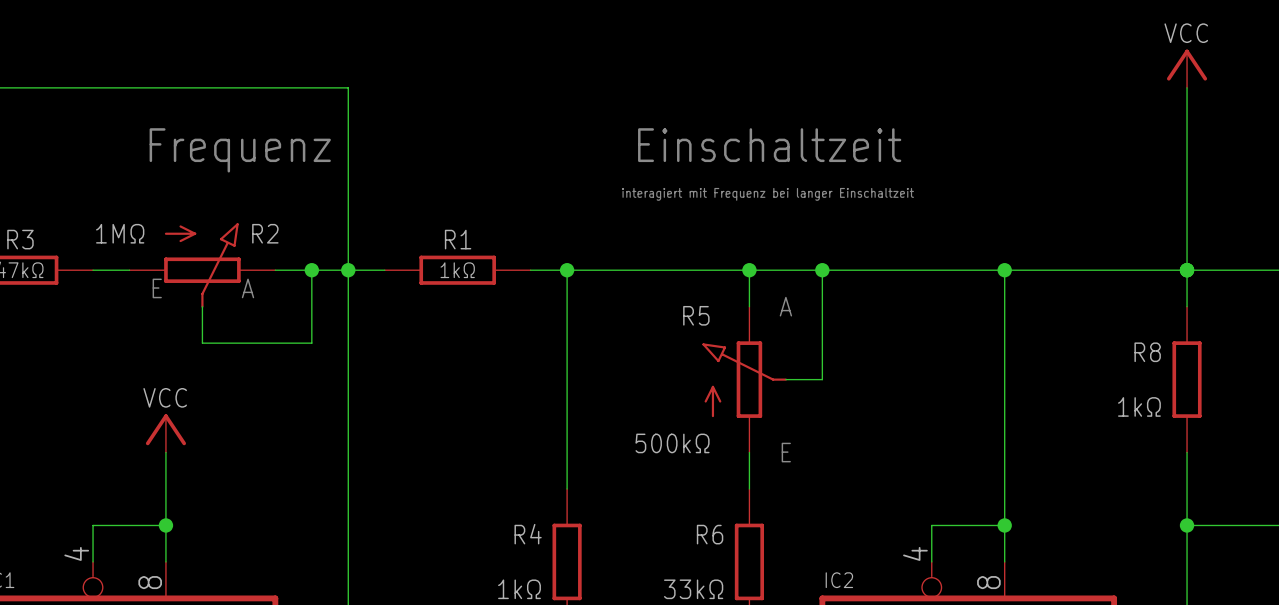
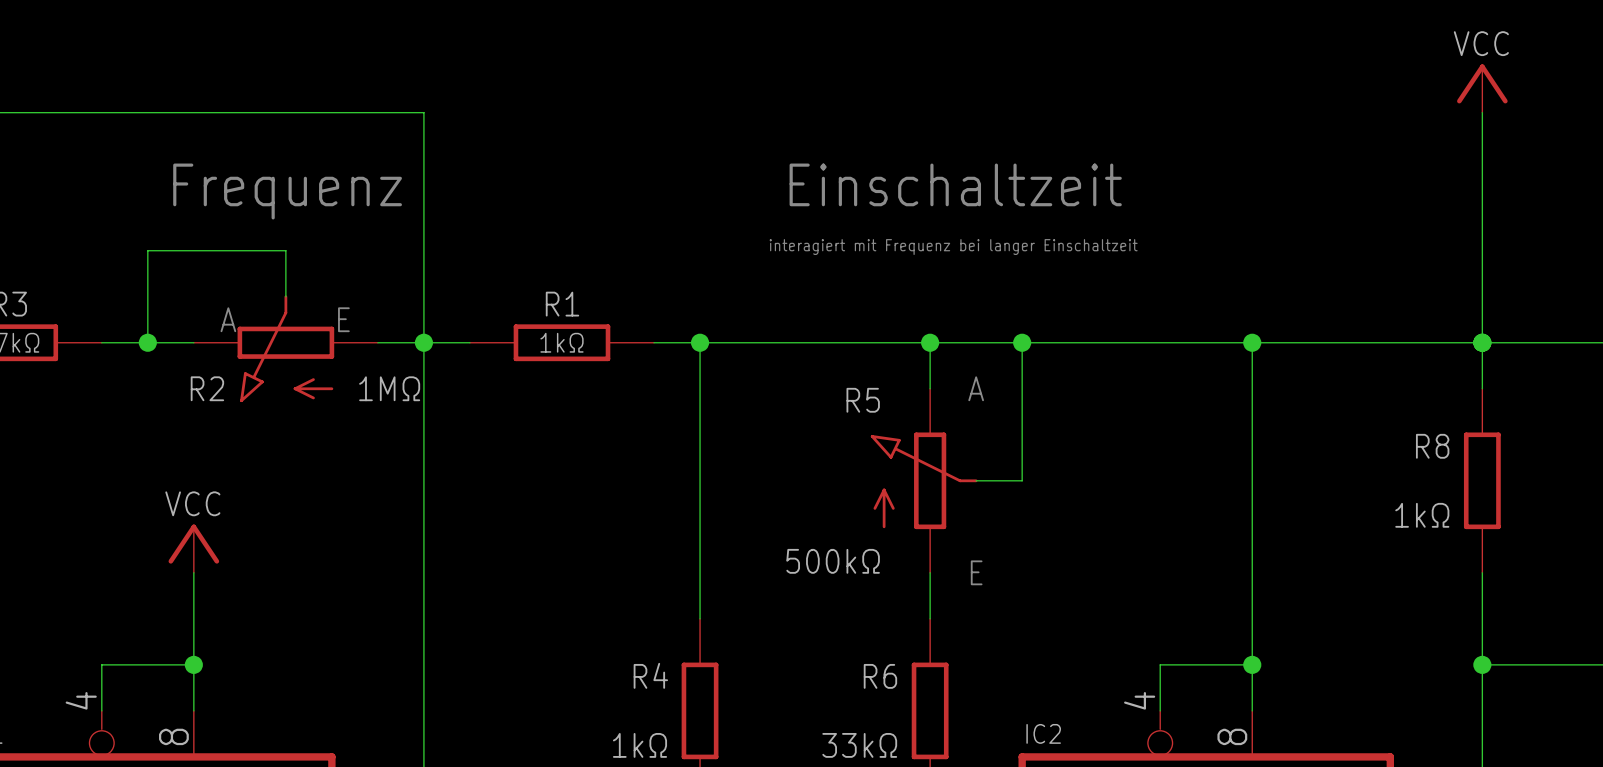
R2 symbol: [129, 223, 276, 308] -> [193, 295, 378, 403]
R2 value position: 1MΩ (120, 233) -> 1MΩ (389, 388)
wire: none -> (285, 296) (285, 250) (147, 250) (147, 342) (193, 342)
R2 name position: R2 (265, 233) -> R2 (207, 388)
junction: none -> (147, 342)
wire: (275, 270) (311, 270) (311, 343) (202, 343) (202, 306) -> none
junction: (311, 270) -> none

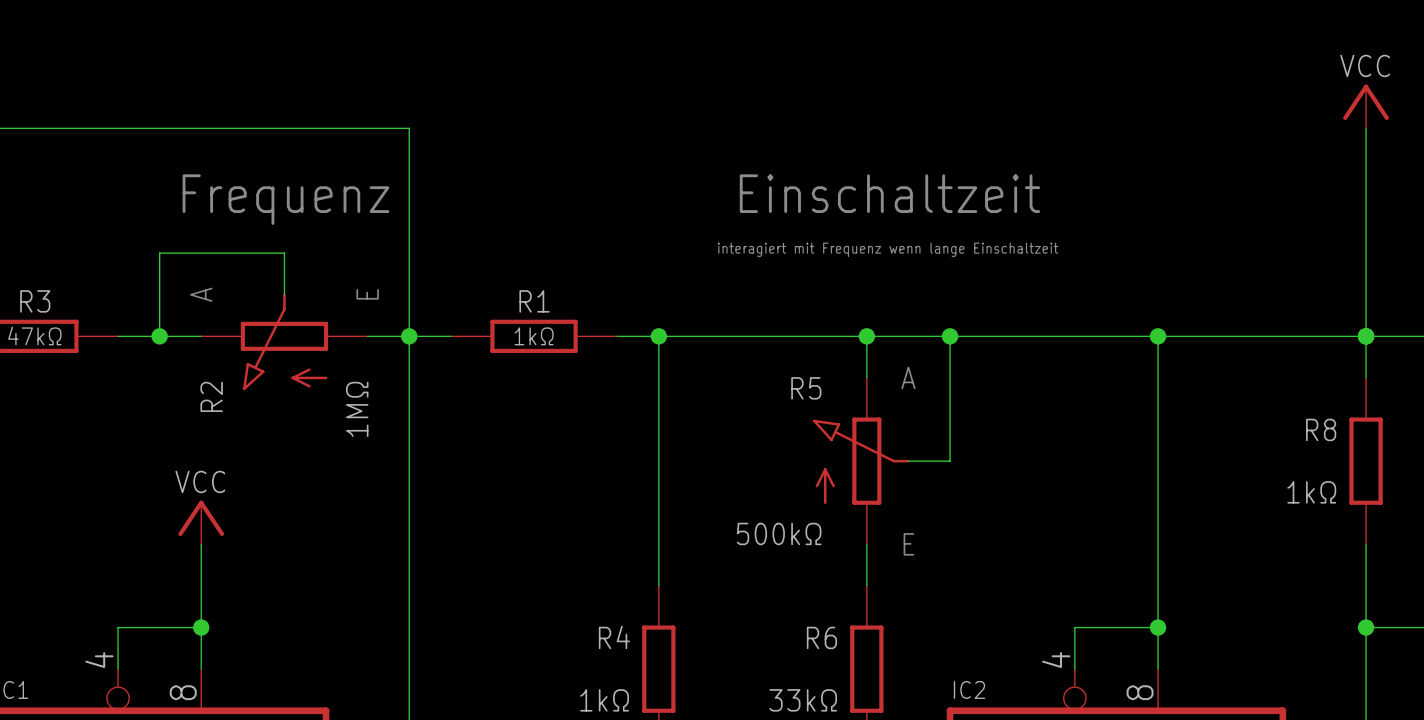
text: interagiert mit Frequenz bei langer Einschaltzeit (953, 247) -> interagiert mit Frequenz wenn lange Einschaltzeit (888, 249)
R2 text rotation: 0° (228, 319) -> 90° counterclockwise (201, 294)
R2 text rotation: 0° (343, 319) -> 90° counterclockwise (367, 294)
R2 name rotation: 0° (207, 388) -> 90° counterclockwise (211, 396)
R2 value rotation: 0° (389, 388) -> 90° counterclockwise (357, 409)

